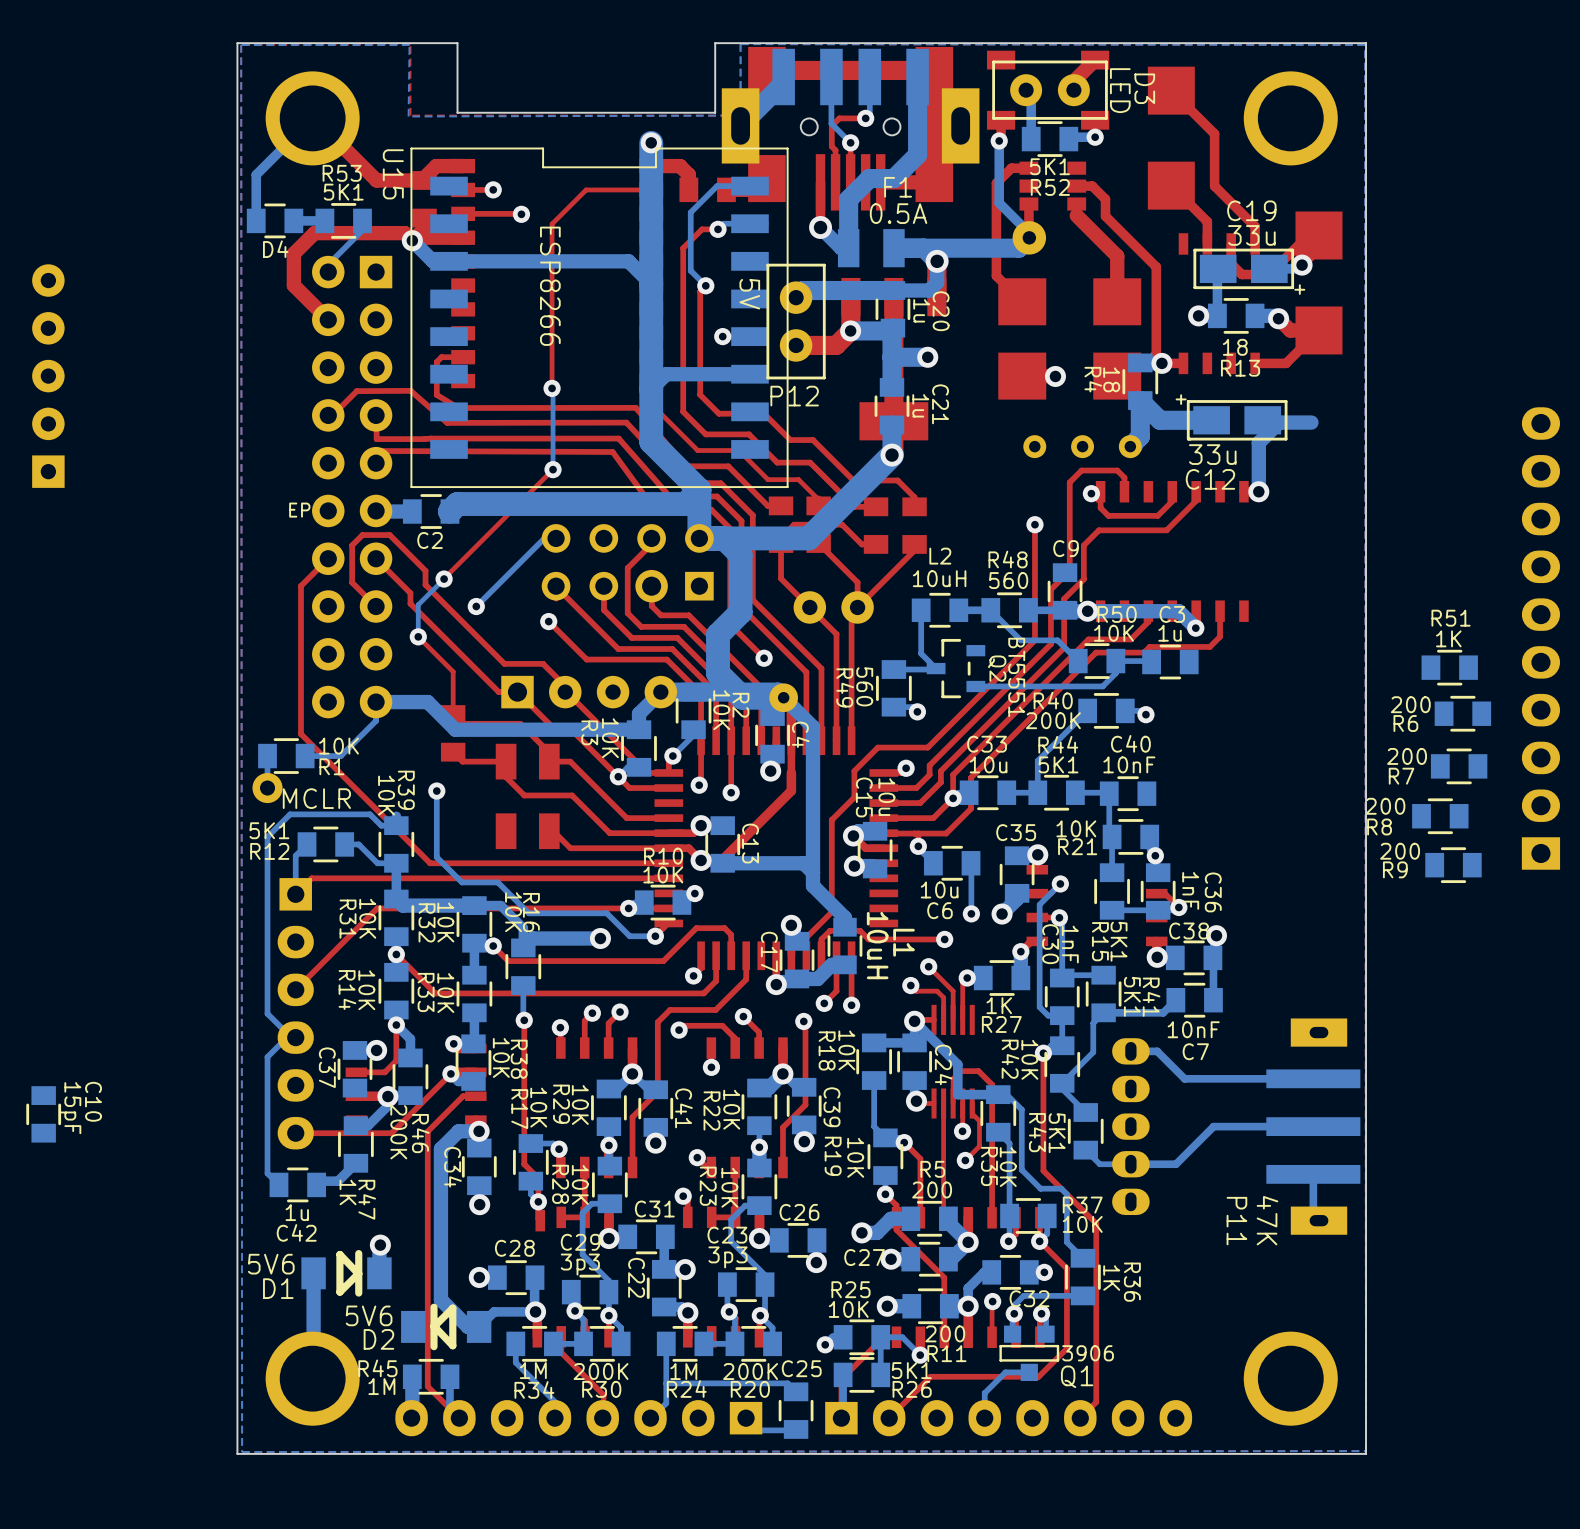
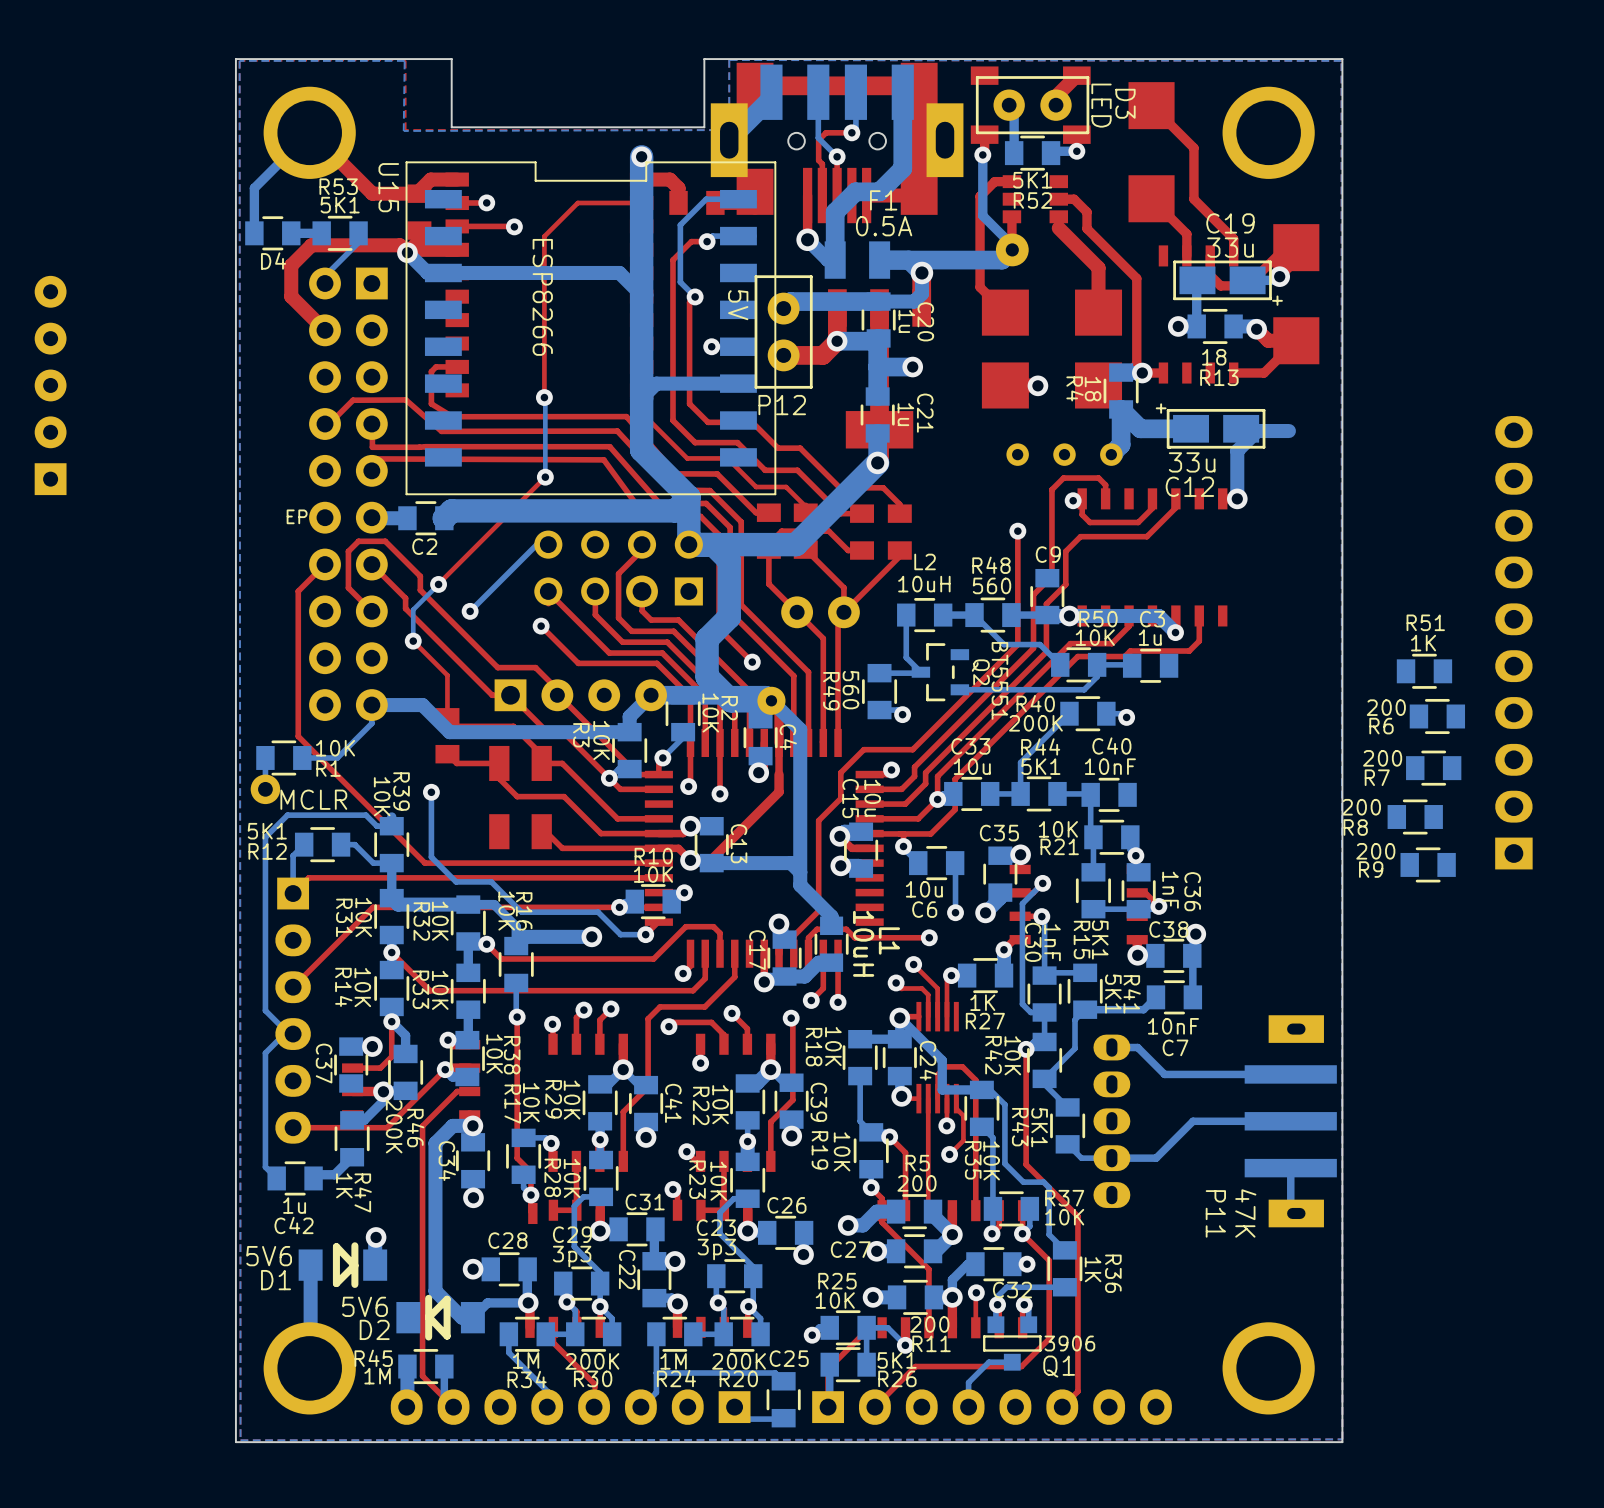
C10: 15pF (43, 1114) -> none

